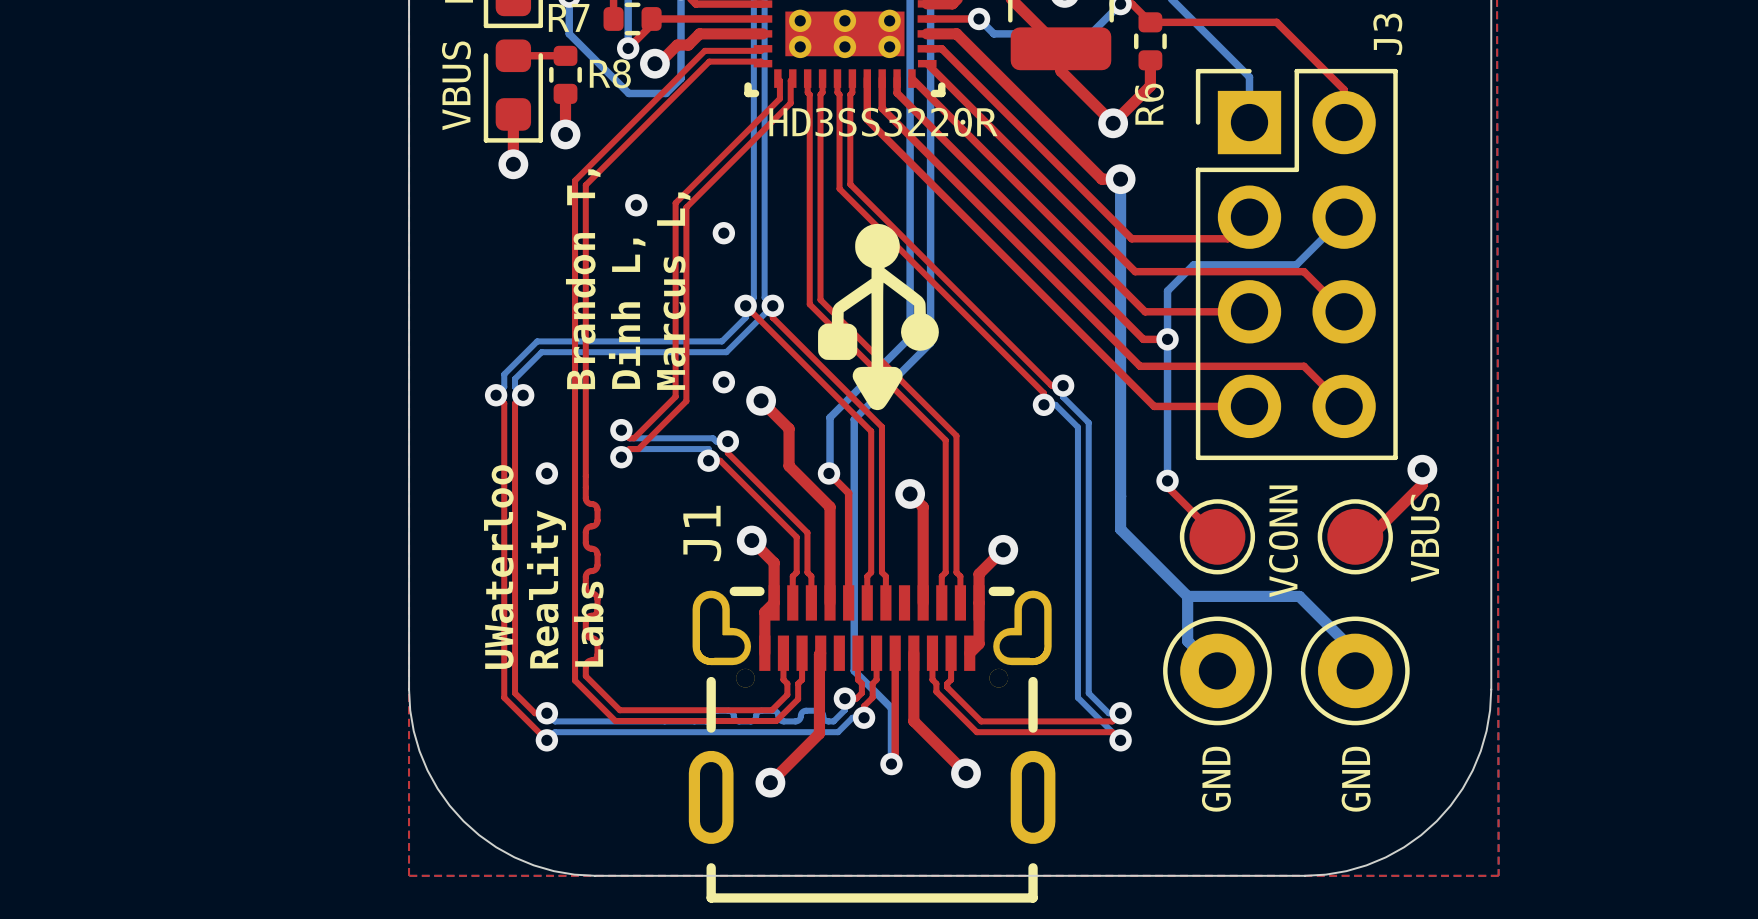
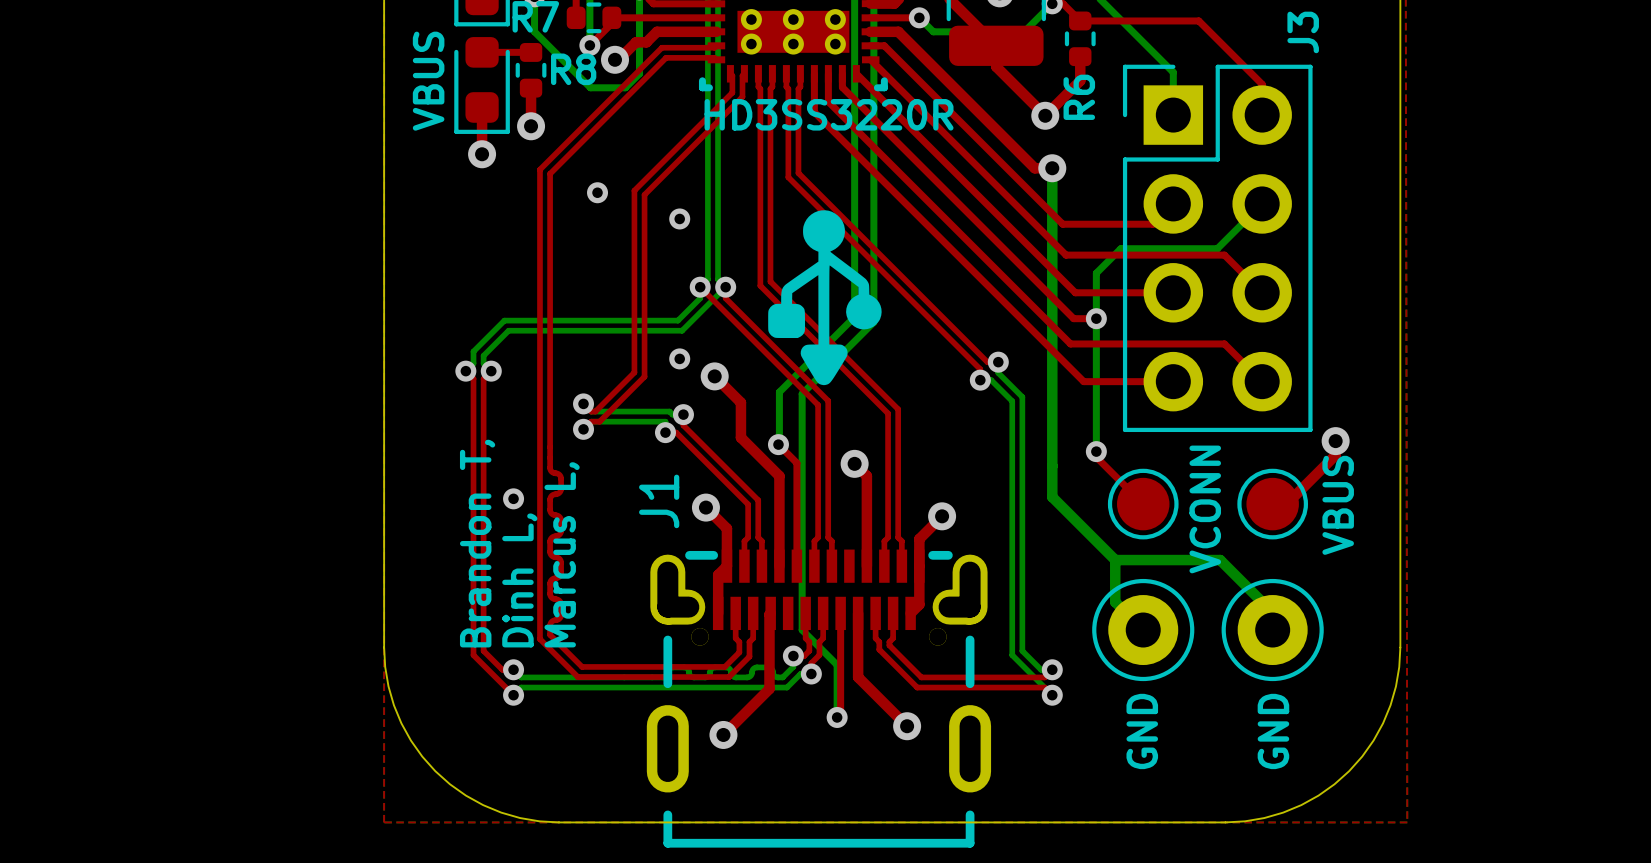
text position: Brandon T, (583, 279) -> Brandon T, (477, 543)
text position: Marcus L, (673, 291) -> Marcus L, (562, 554)
text position: Dinh L, (627, 313) -> Dinh L, (519, 580)
via position: (546, 473) -> (513, 498)
text: UWaterloo (498, 567) -> none
text: Reality (546, 589) -> none
text: Labs (588, 624) -> none

